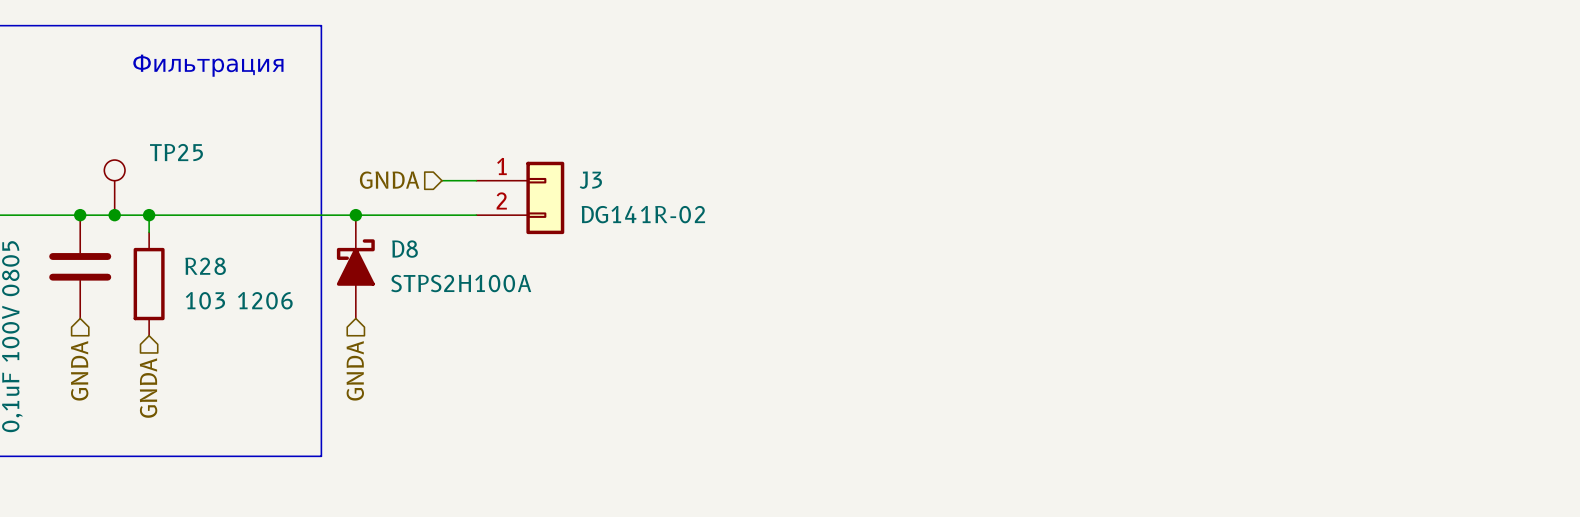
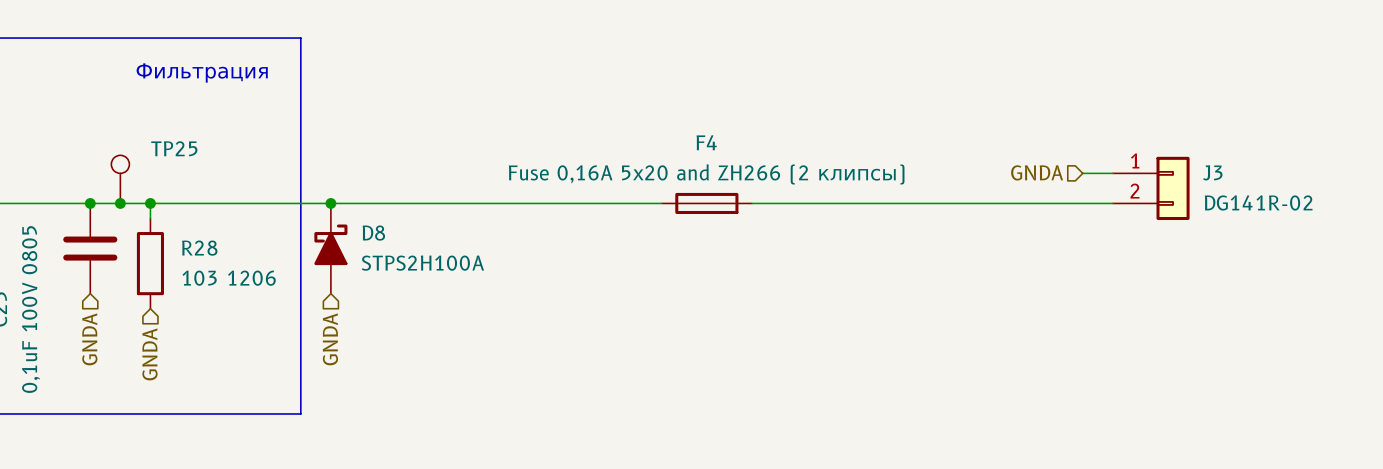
hierarchical label: GNDA (389, 180) -> none
wire: (441, 180) (476, 180) -> none
hierarchical label: none -> GNDA (1037, 172)
wire: none -> (1082, 173) (1112, 173)
J3 position: (520, 197) -> (1151, 188)
wire: none -> (436, 203) (661, 203)
F4: none -> Fuse 0,16A 5x20 and ZH266 (2 клипсы) (706, 203)
wire: none -> (751, 203) (1112, 203)

